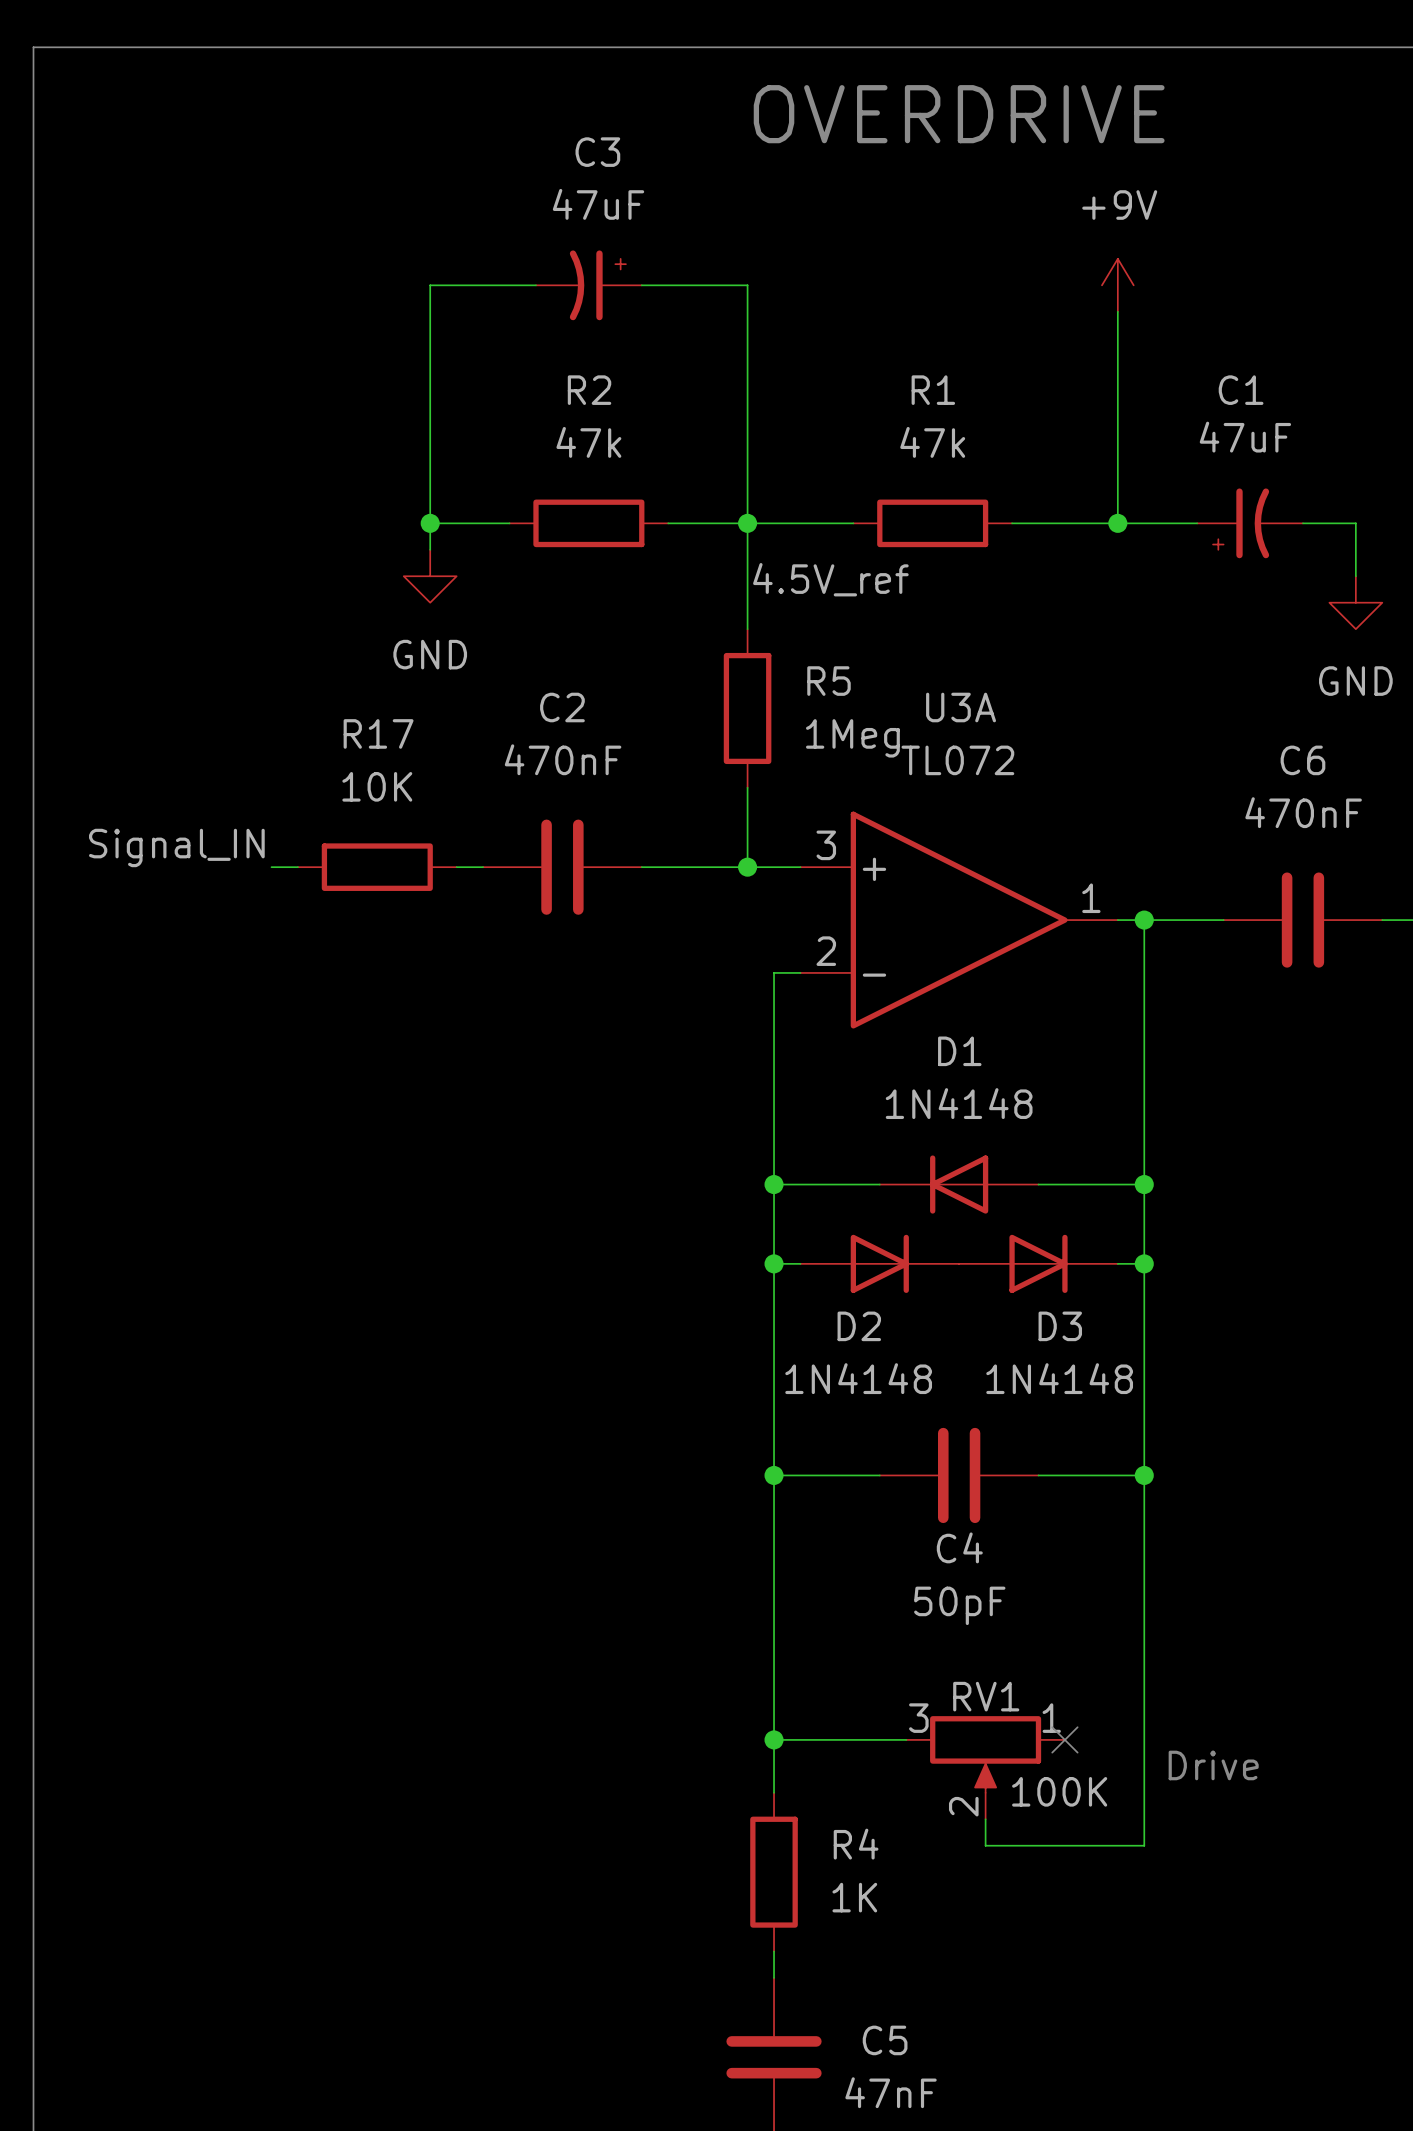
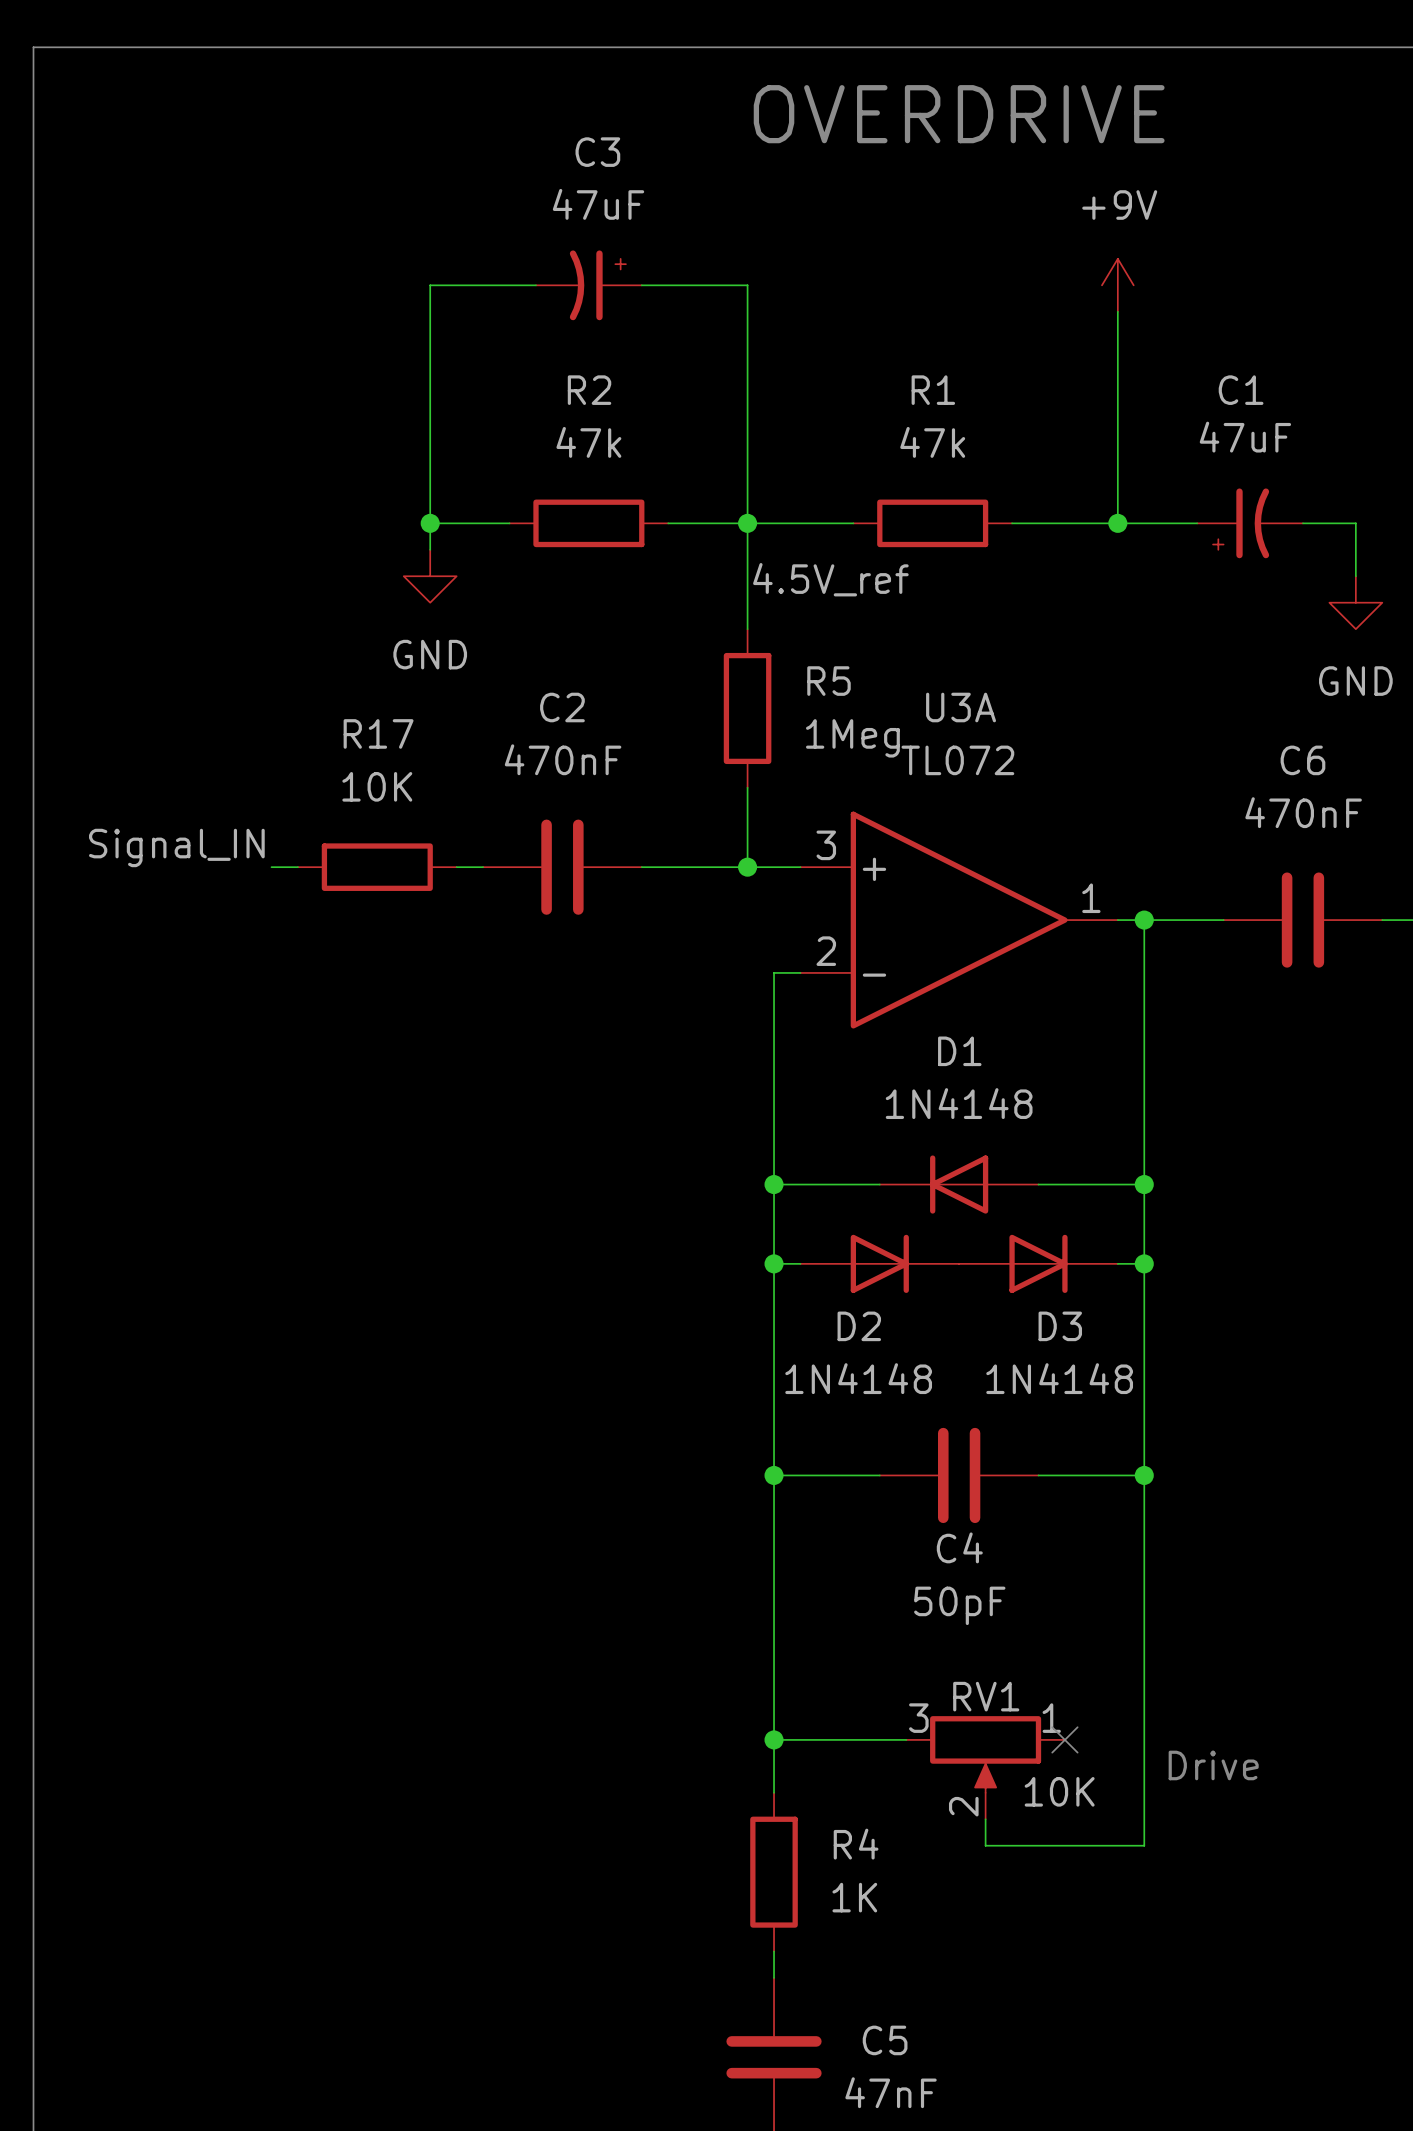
RV1 value: 100K (1059, 1791) -> 10K (1059, 1791)

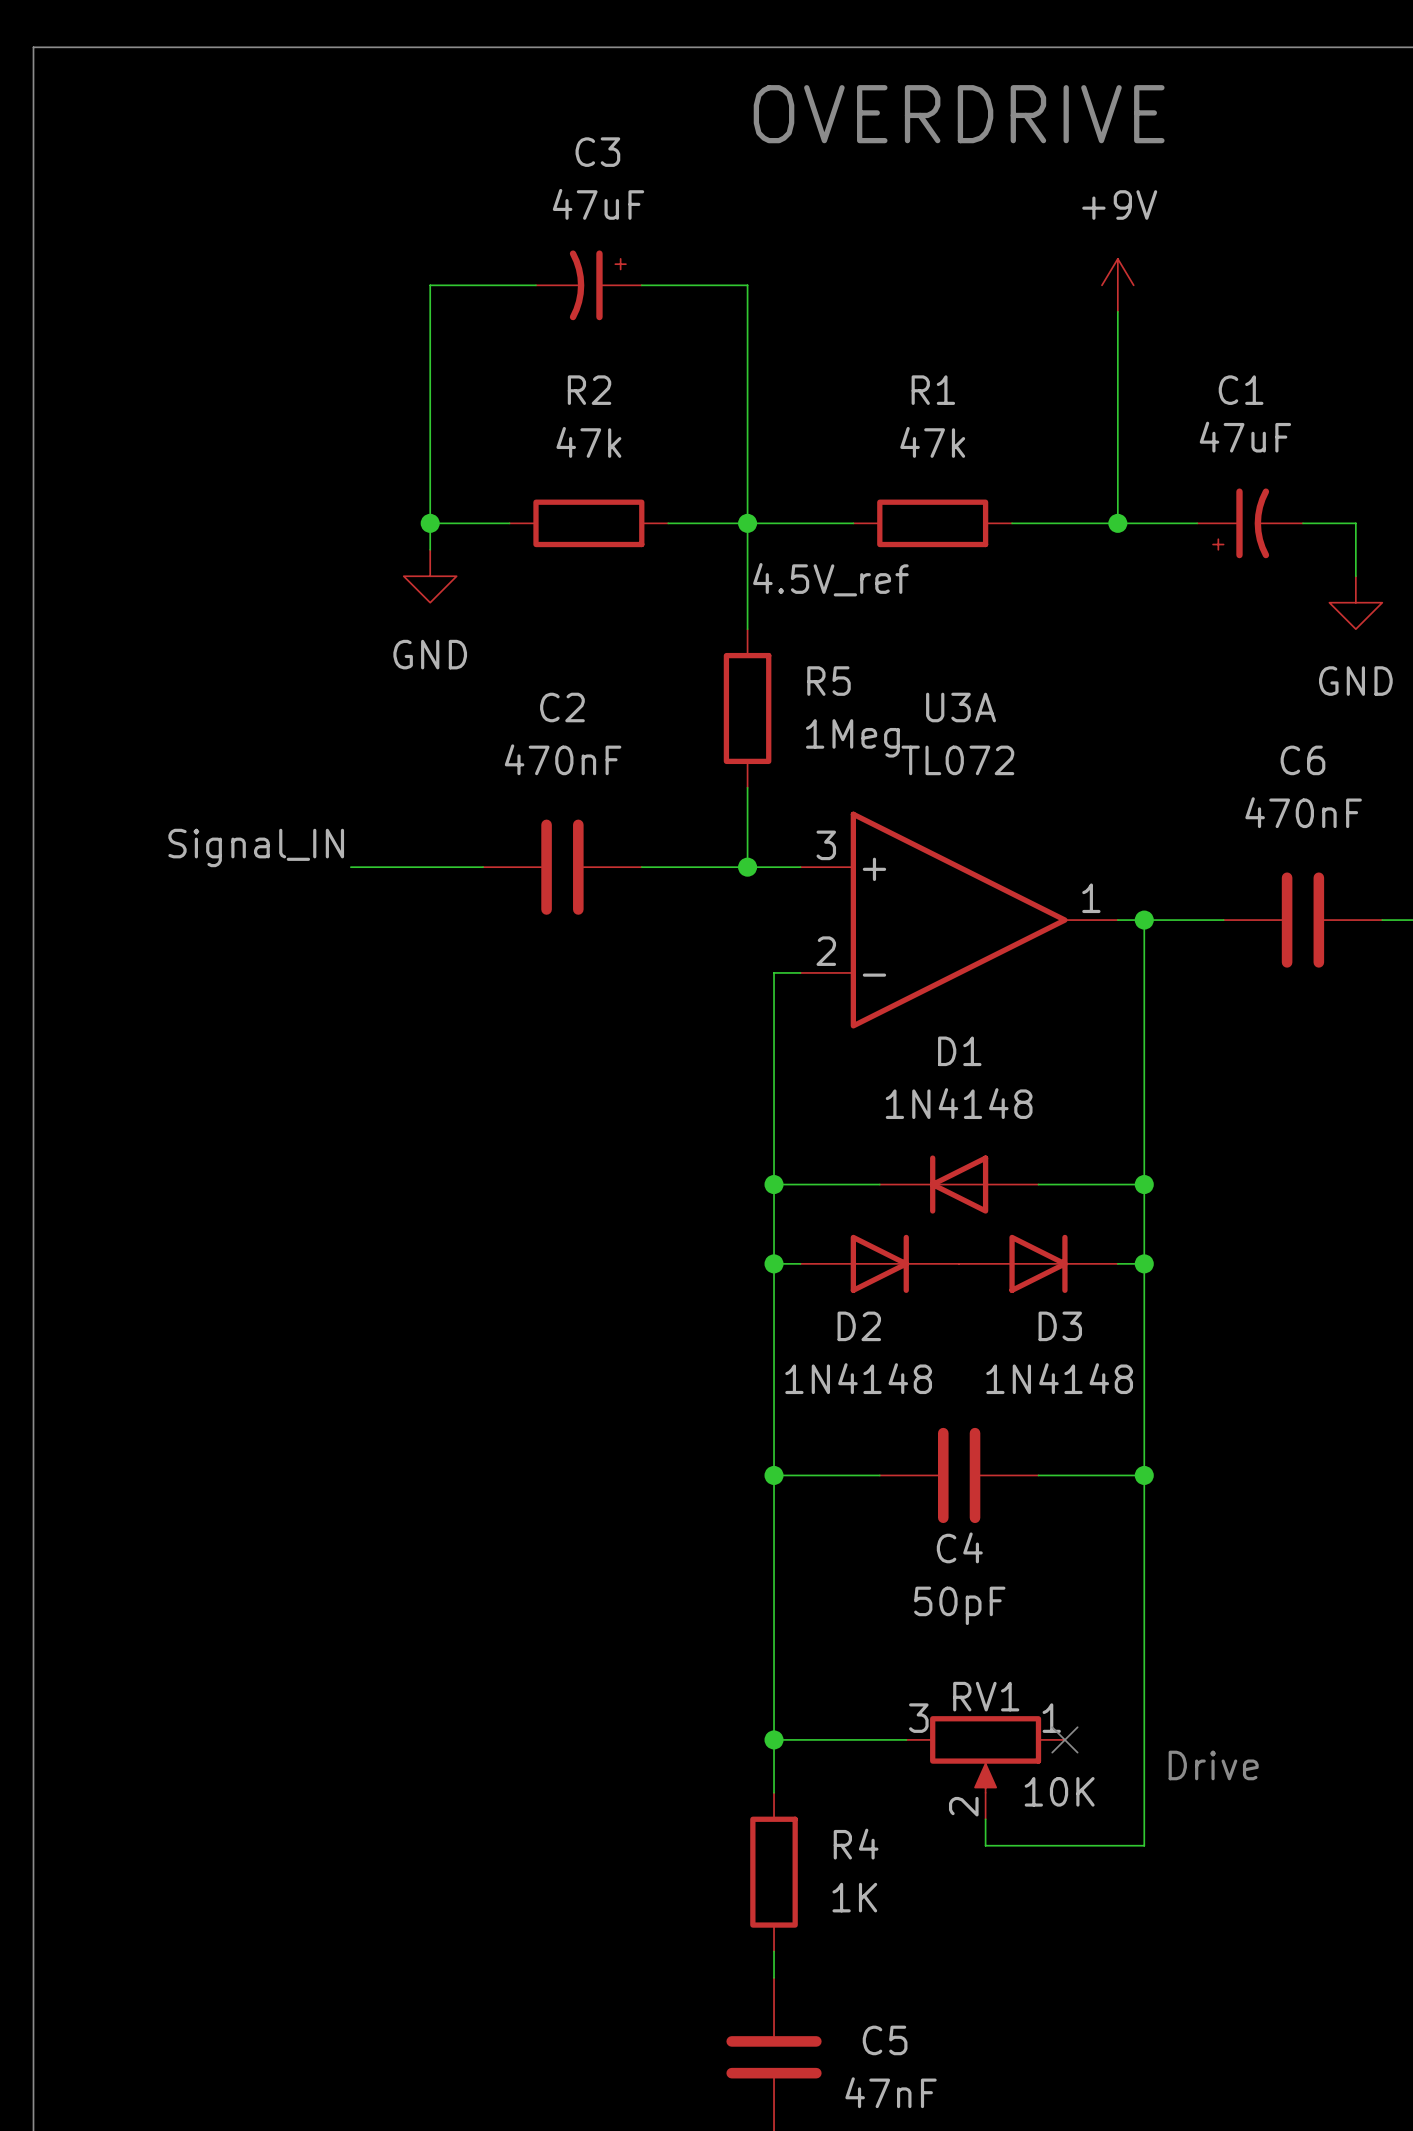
label position: Signal_IN (176, 847) -> Signal_IN (256, 847)
wire: (271, 867) (297, 867) -> none
wire: none -> (350, 867) (456, 867)
R17: 10K (377, 867) -> none

